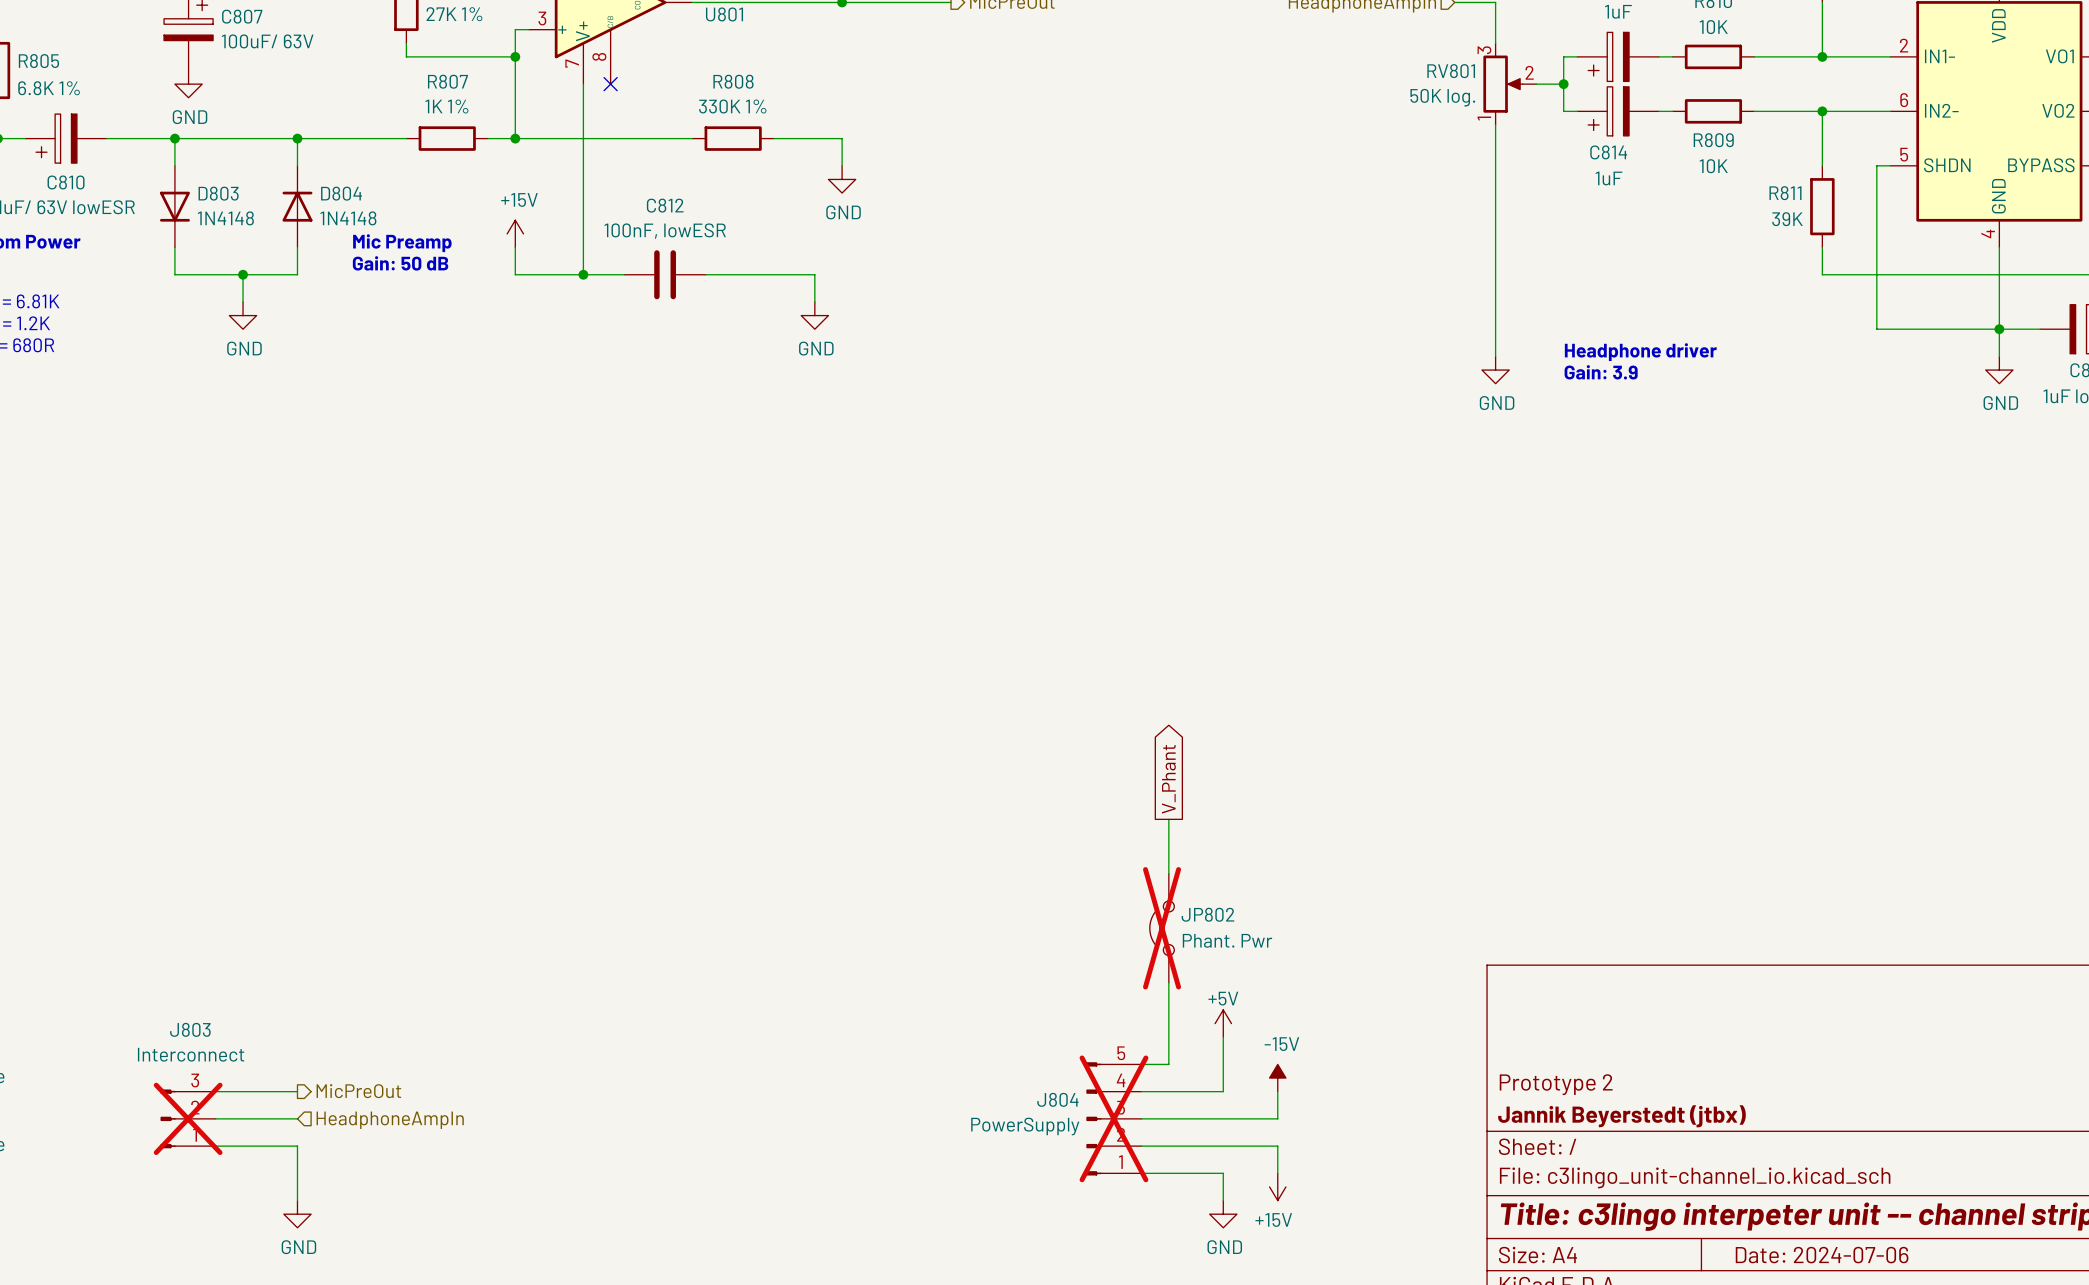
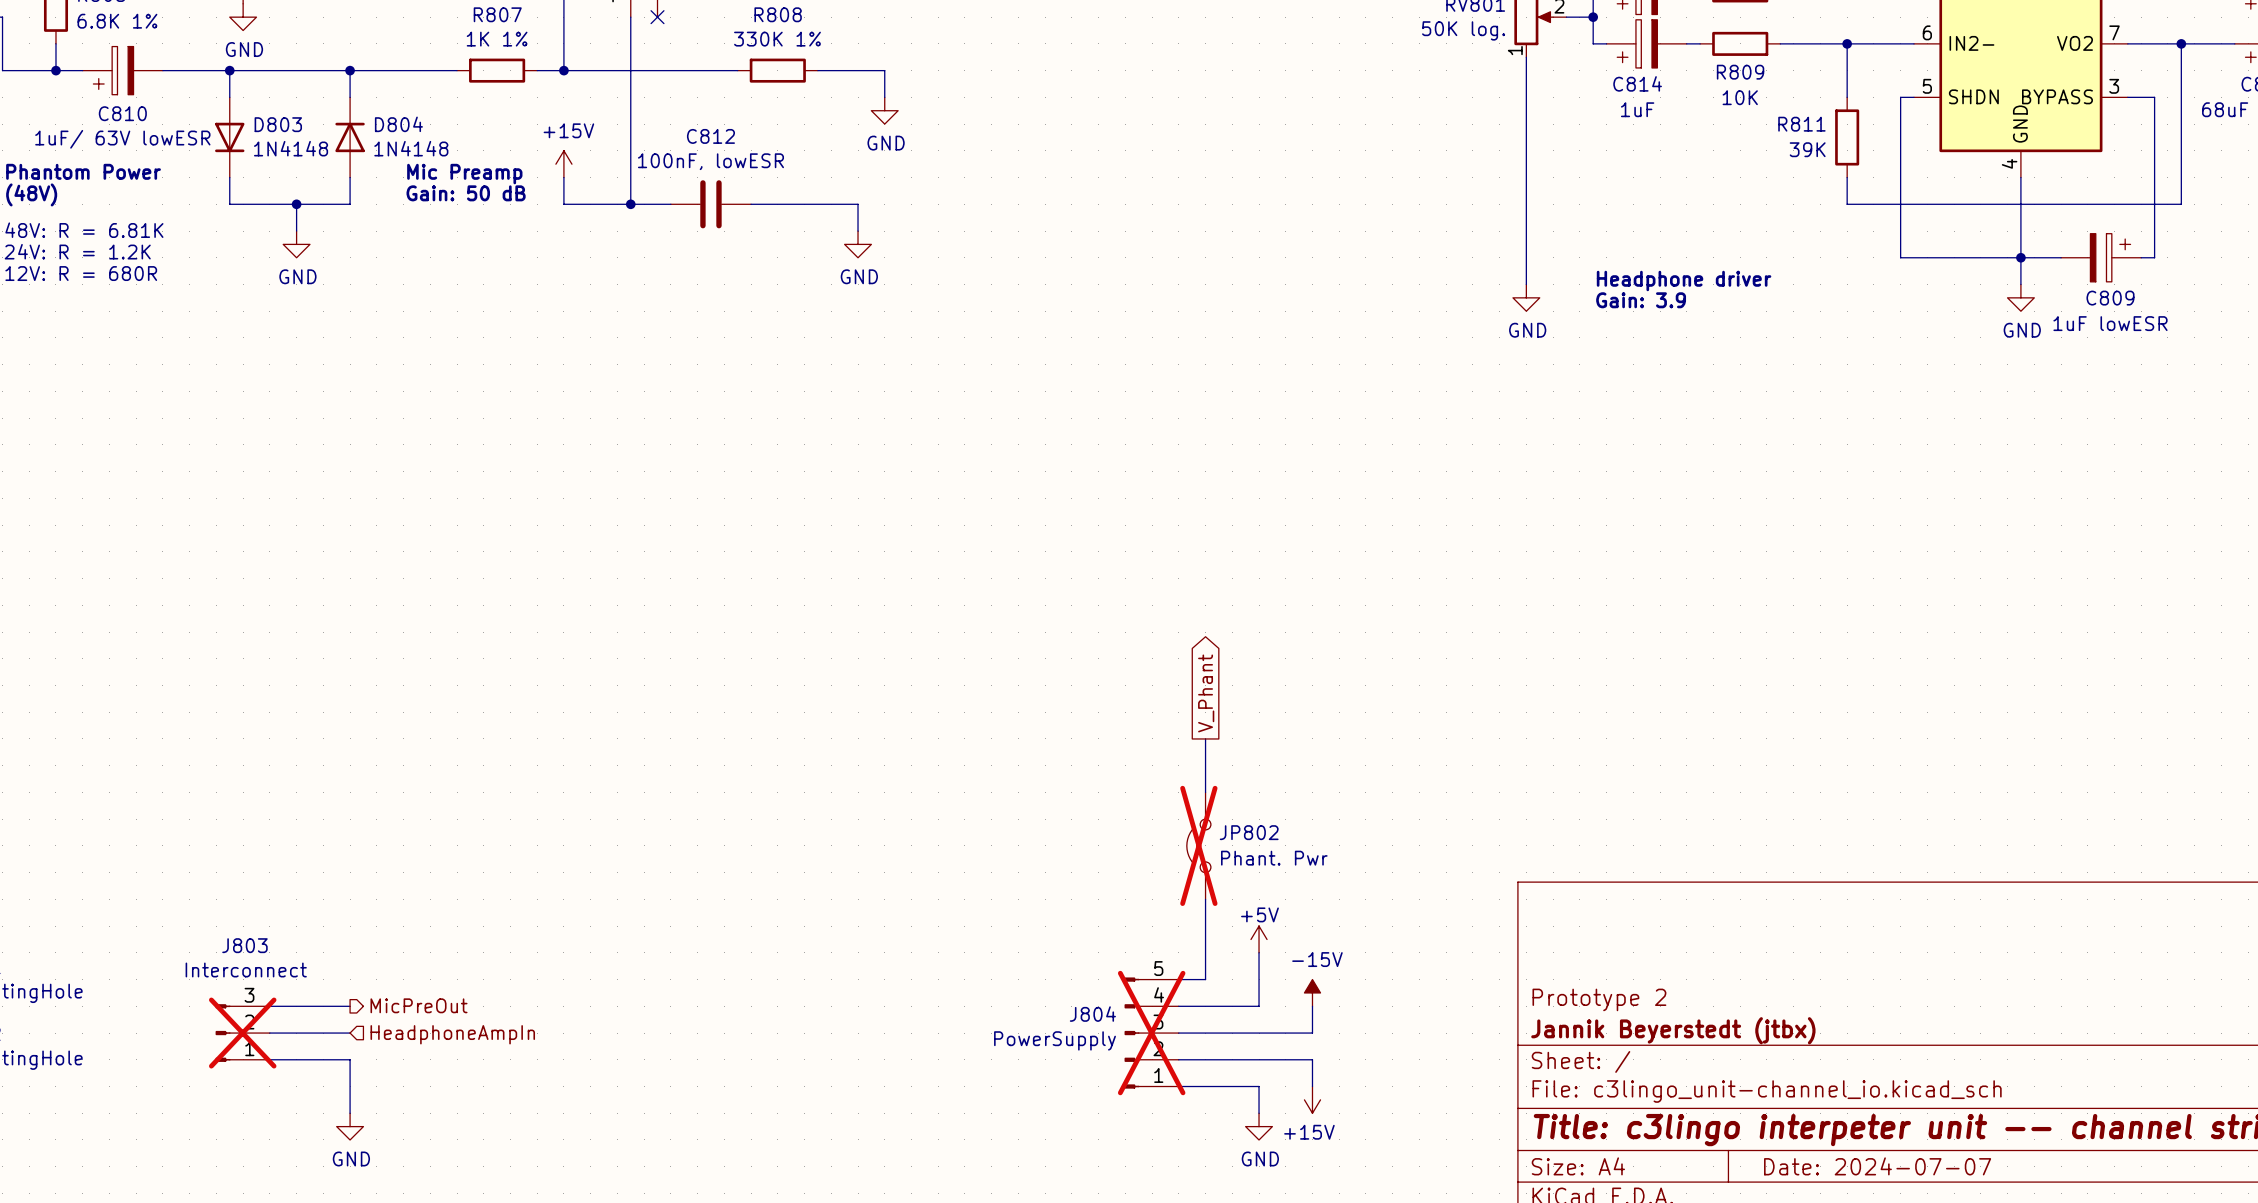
title block: Date: 2024-07-06 (1822, 1255) -> Date: 2024-07-07 (1877, 1166)

